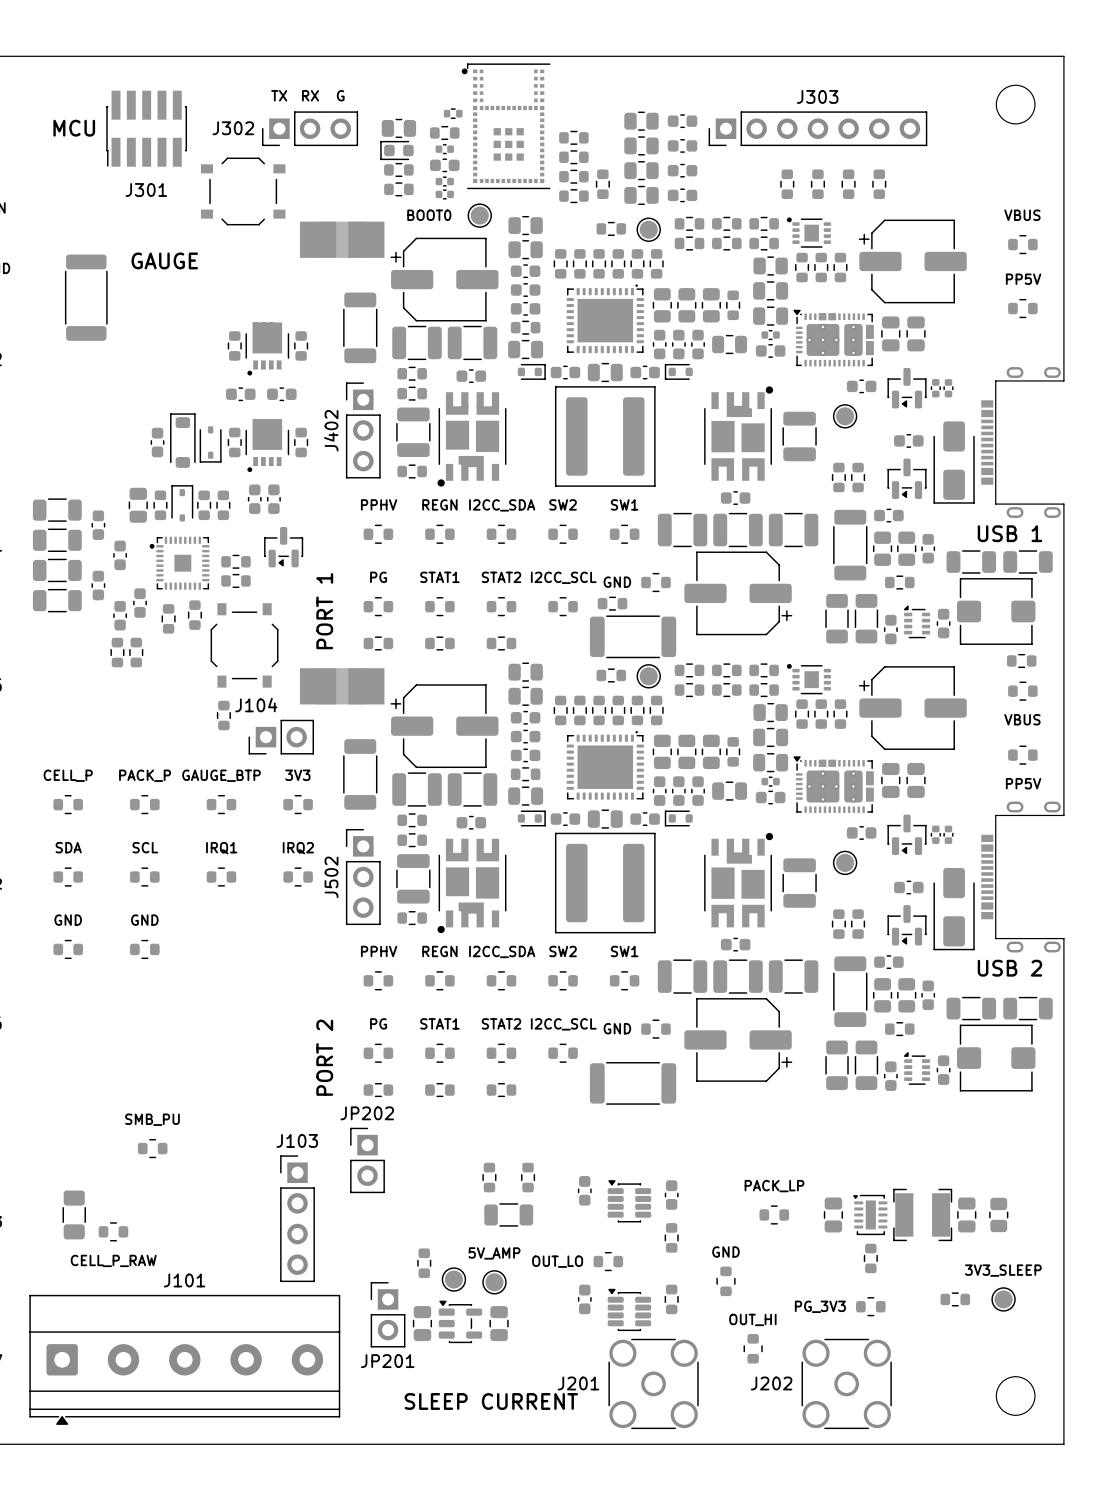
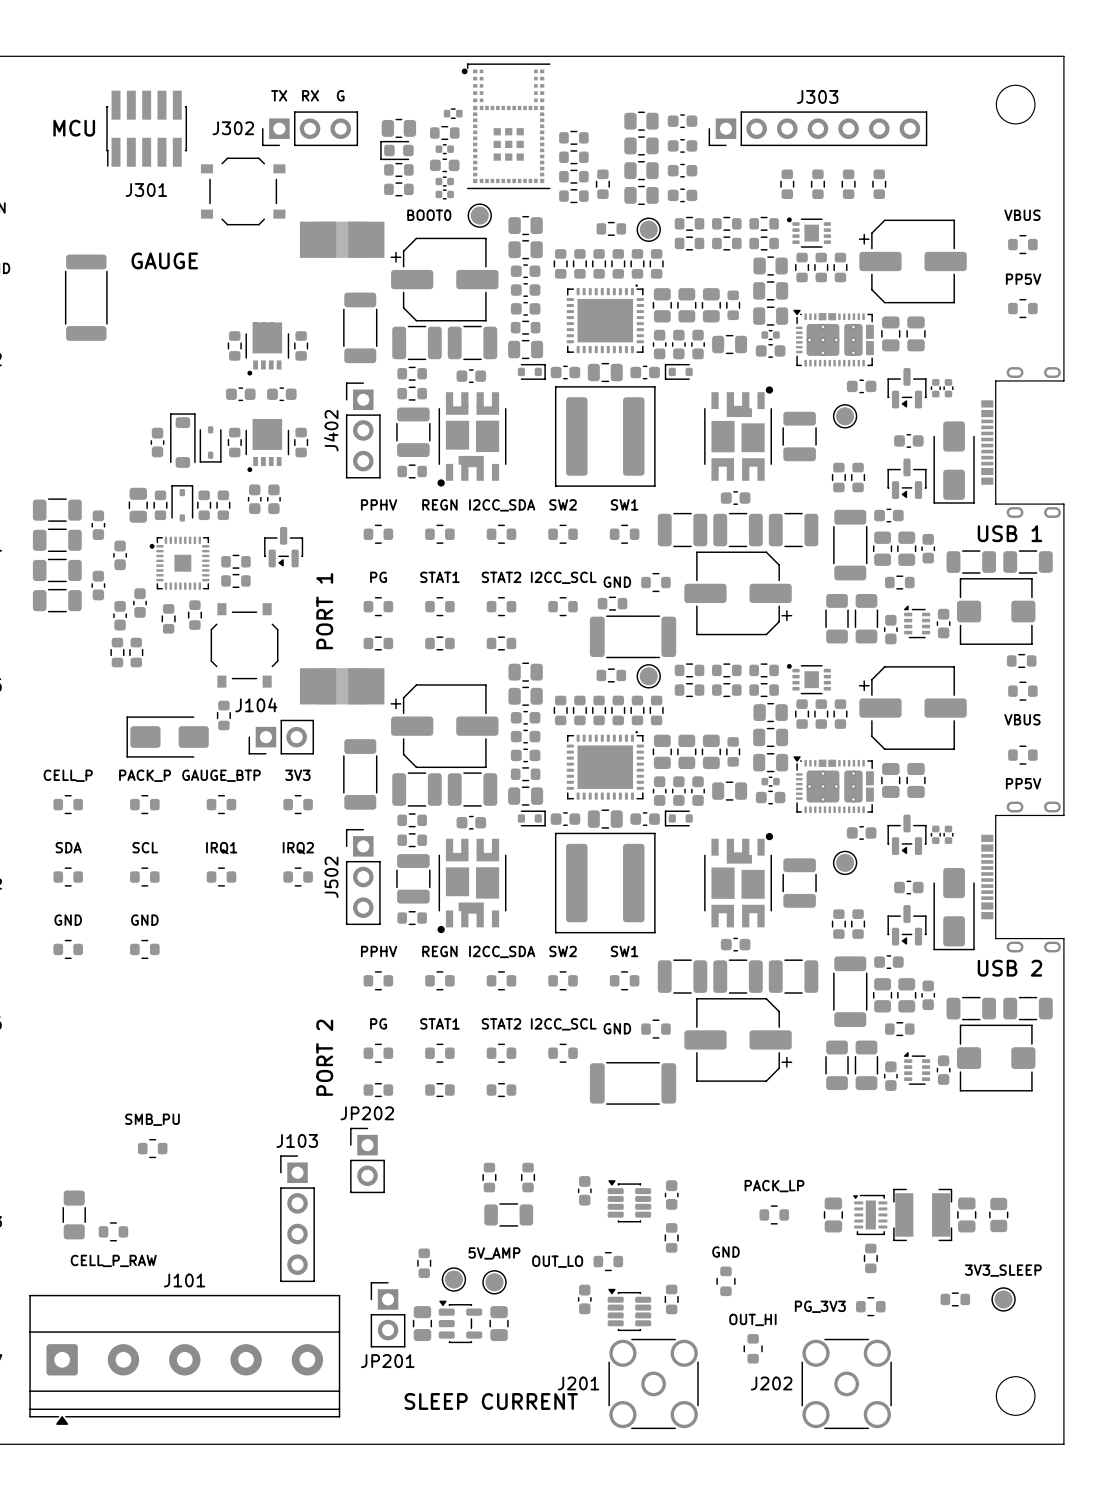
part: none -> (167, 737)

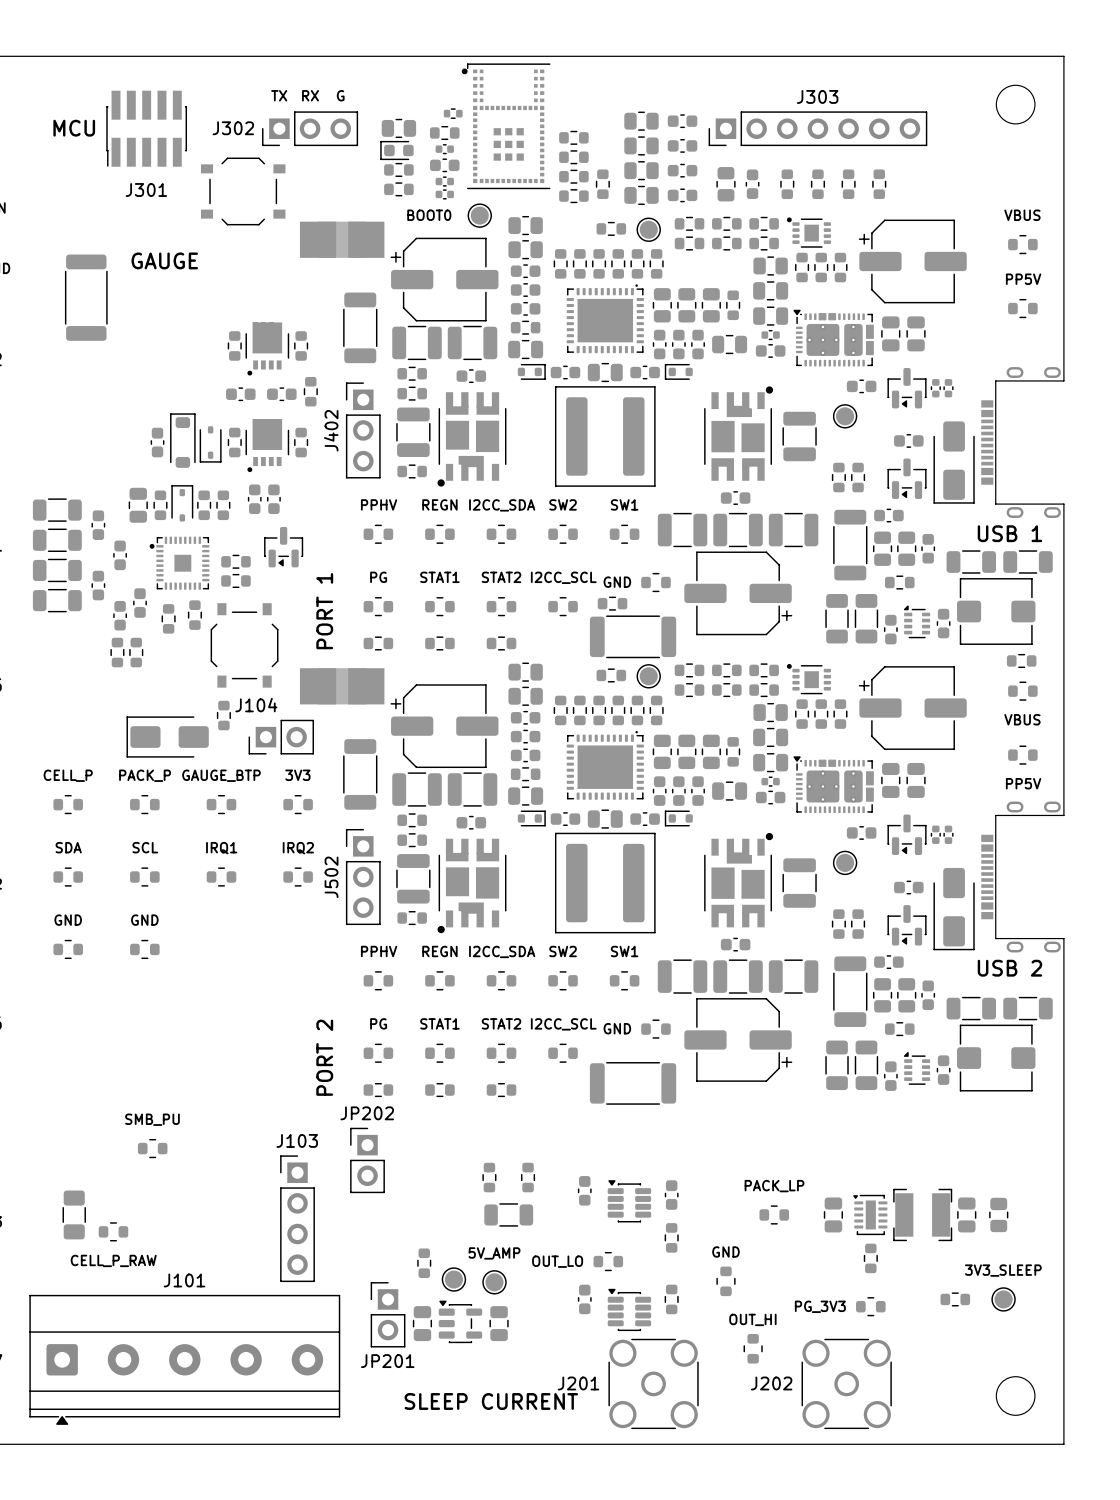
part: none -> (725, 184)
part: none -> (752, 184)
part: none -> (310, 391)

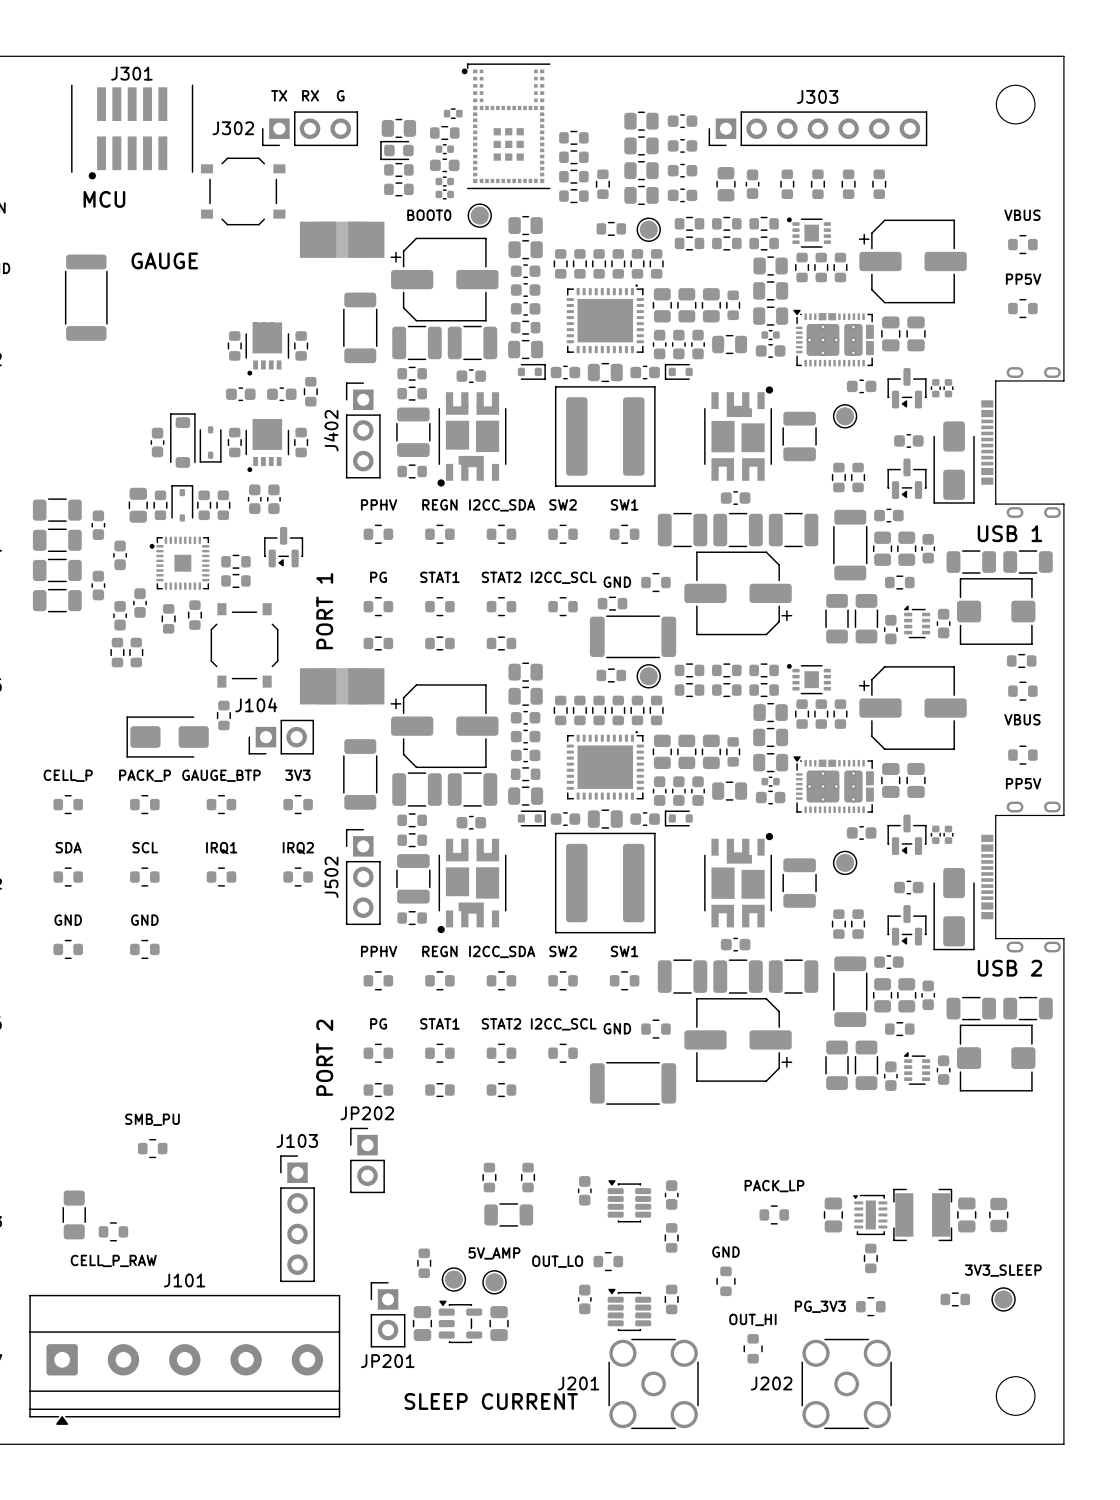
J301 footprint: [106, 90, 188, 167] -> [71, 84, 194, 180]
text position: MCU (74, 128) -> MCU (104, 199)
J301 name position: J301 (146, 190) -> J301 (131, 73)

